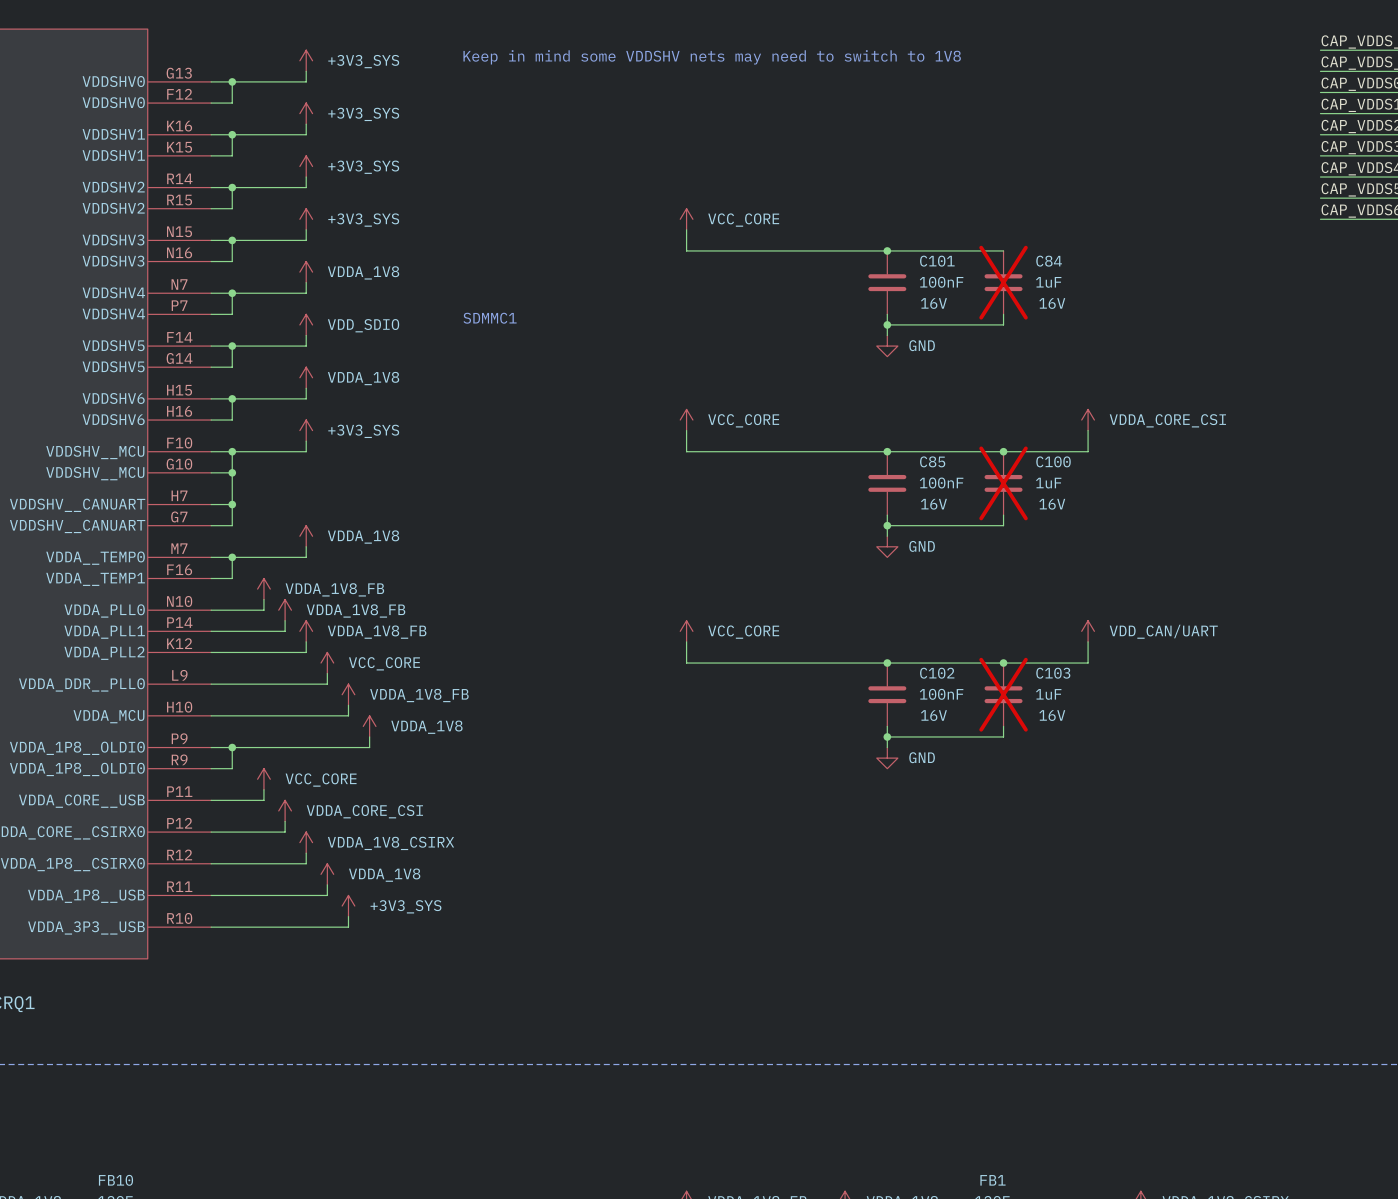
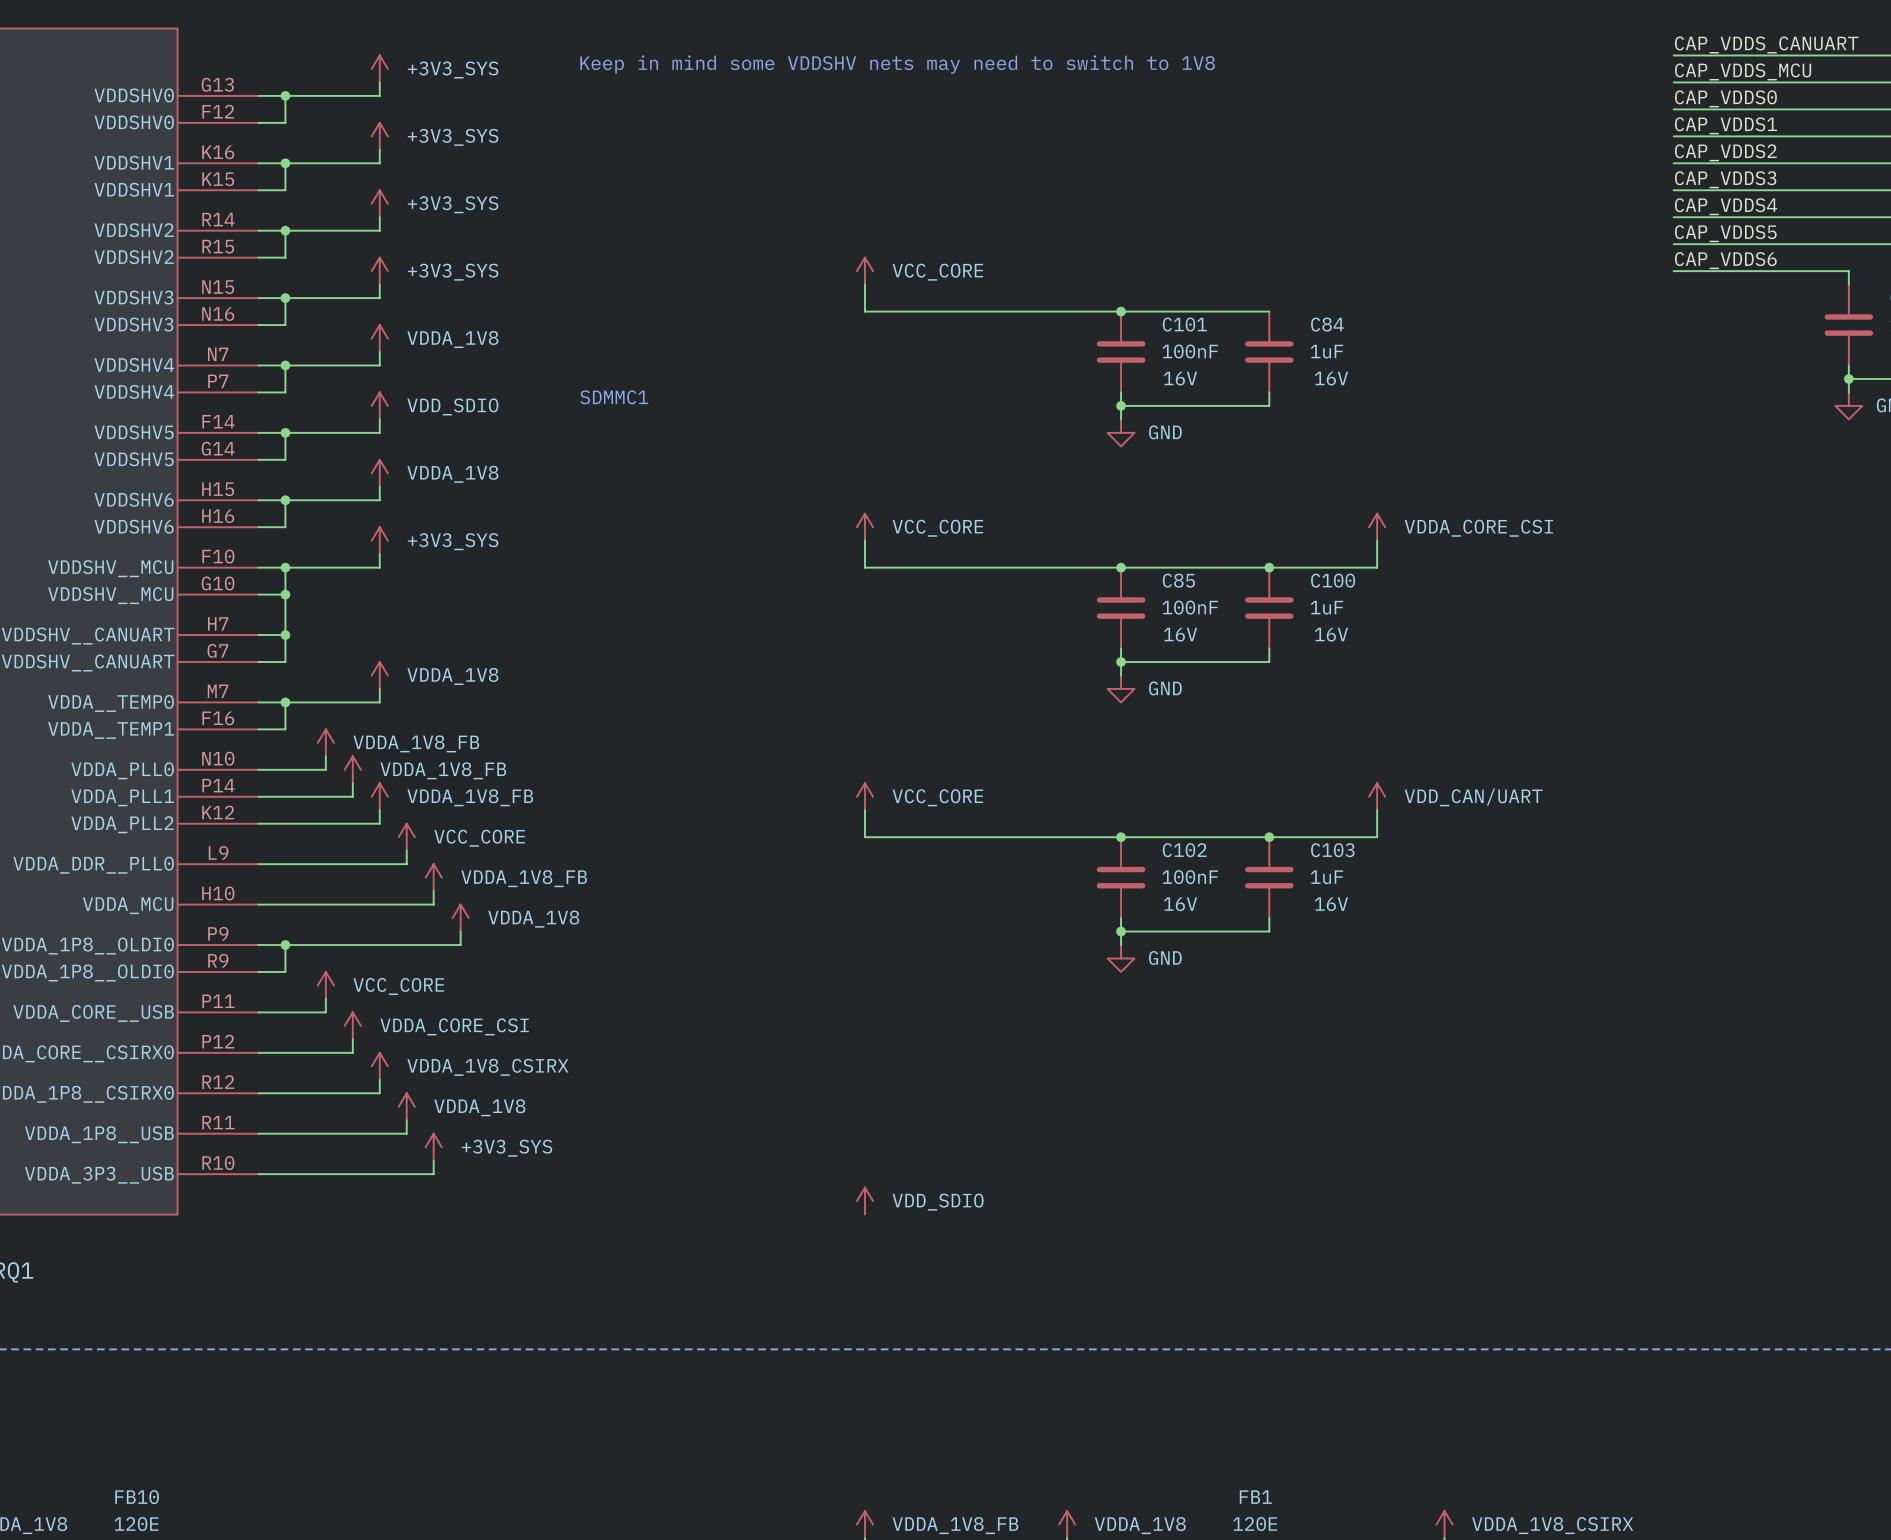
C84 do-not-place cross: (1003, 282) -> none
C100 do-not-place cross: (1003, 483) -> none
C103 do-not-place cross: (1003, 694) -> none
power symbol: none -> VDD_SDIO (864, 1201)

